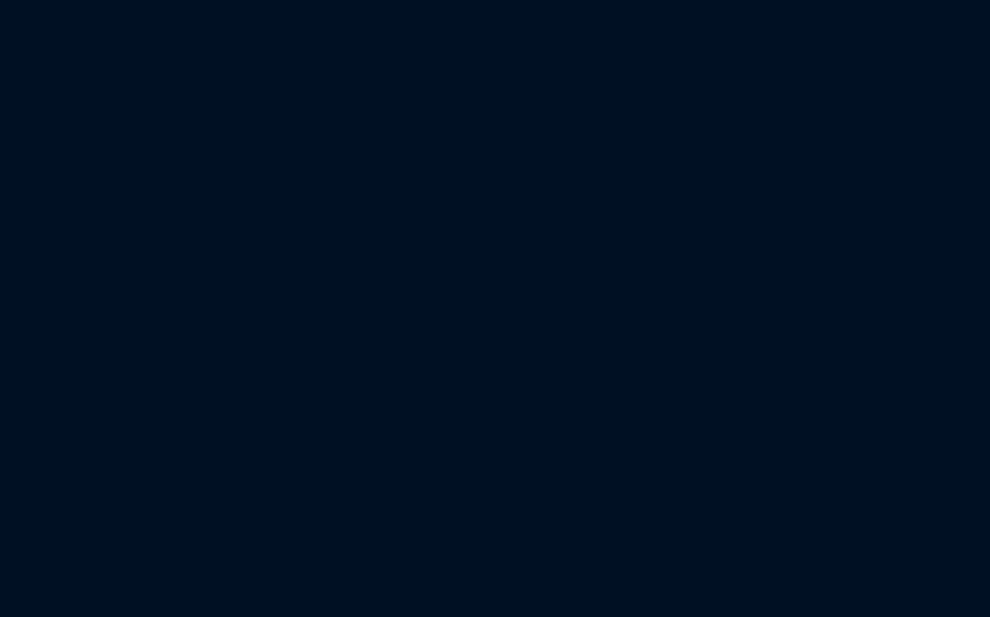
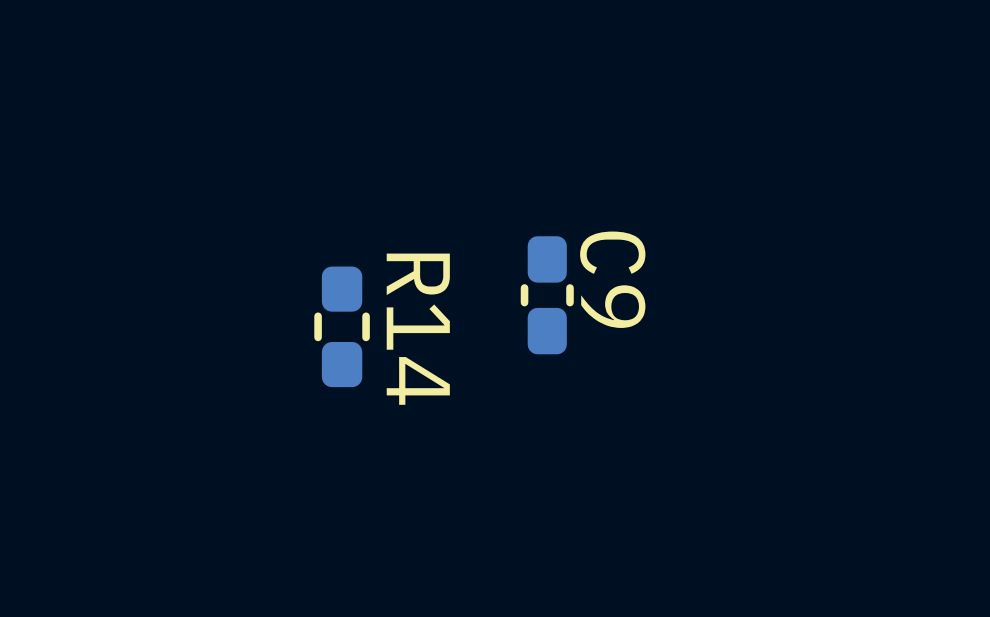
C9: none -> (547, 295)
R14: none -> (342, 326)

